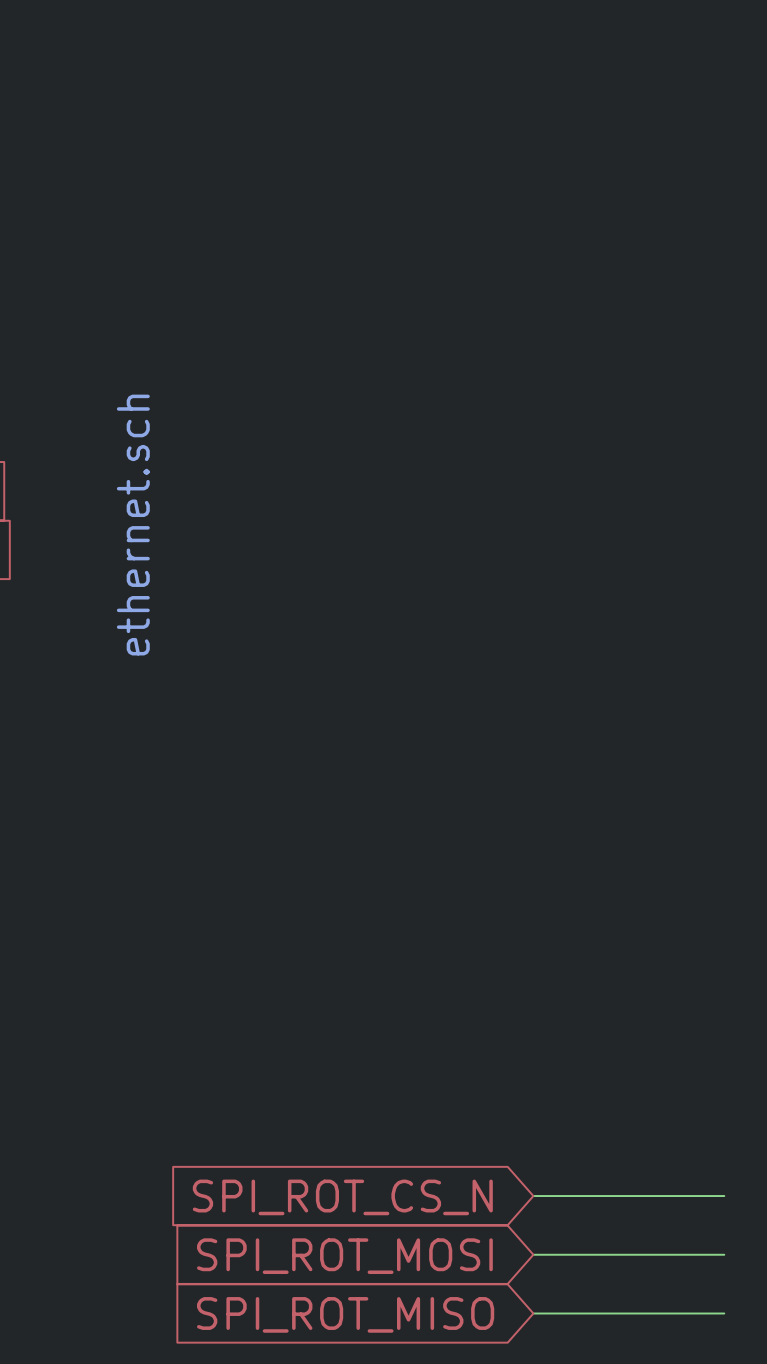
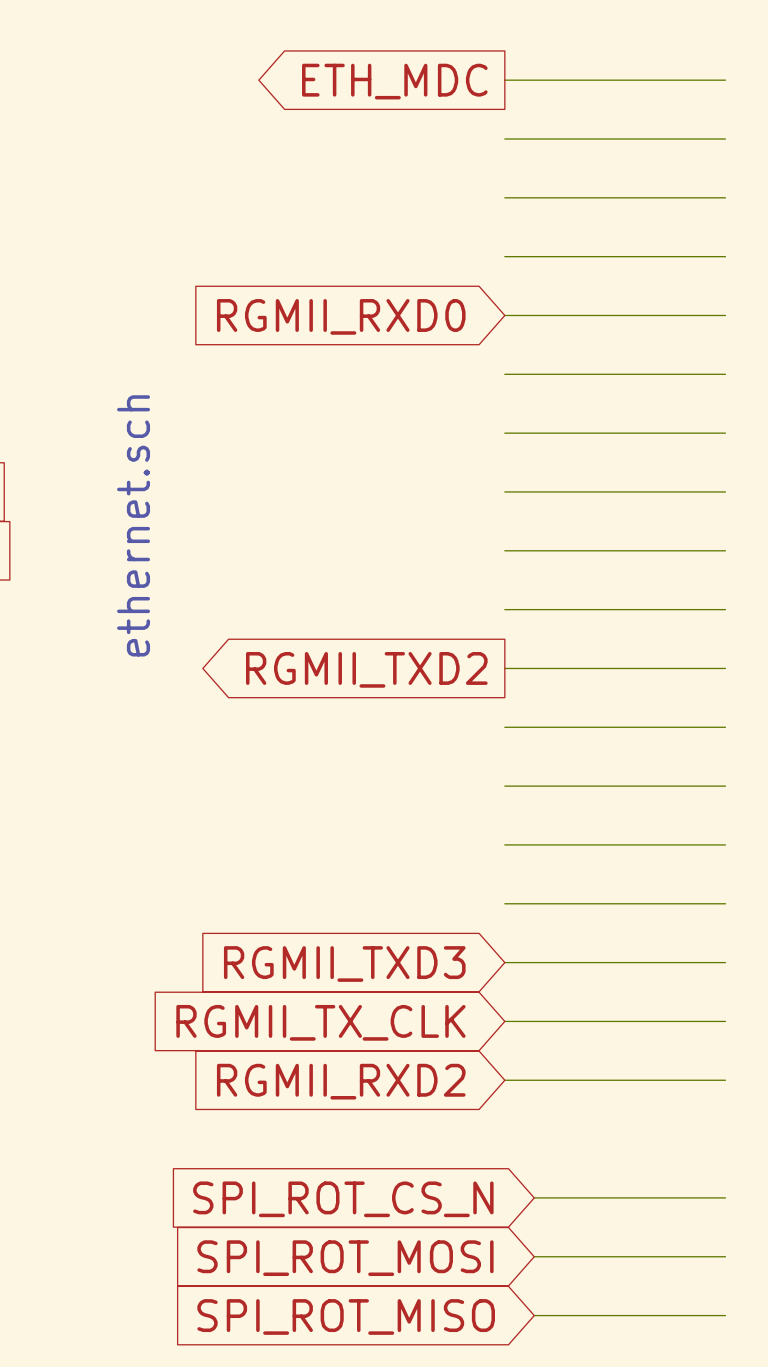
wire: none -> (504, 80) (725, 80)
global label: none -> ETH_MDC (394, 81)
wire: none -> (504, 139) (725, 139)
wire: none -> (504, 197) (725, 197)
wire: none -> (504, 256) (725, 256)
wire: none -> (504, 315) (725, 315)
global label: none -> RGMII_RXD0 (341, 316)
wire: none -> (504, 374) (725, 374)
wire: none -> (504, 433) (725, 433)
wire: none -> (504, 491) (725, 491)
wire: none -> (504, 550) (725, 550)
wire: none -> (504, 609) (725, 609)
wire: none -> (504, 668) (725, 668)
global label: none -> RGMII_TXD2 (366, 669)
wire: none -> (504, 727) (725, 727)
wire: none -> (504, 786) (725, 786)
wire: none -> (504, 844) (725, 844)
wire: none -> (504, 903) (725, 903)
wire: none -> (504, 962) (725, 962)
global label: none -> RGMII_TXD3 (344, 964)
wire: none -> (504, 1021) (725, 1021)
global label: none -> RGMII_TX_CLK (320, 1022)
wire: none -> (504, 1080) (725, 1080)
global label: none -> RGMII_RXD2 (341, 1081)

